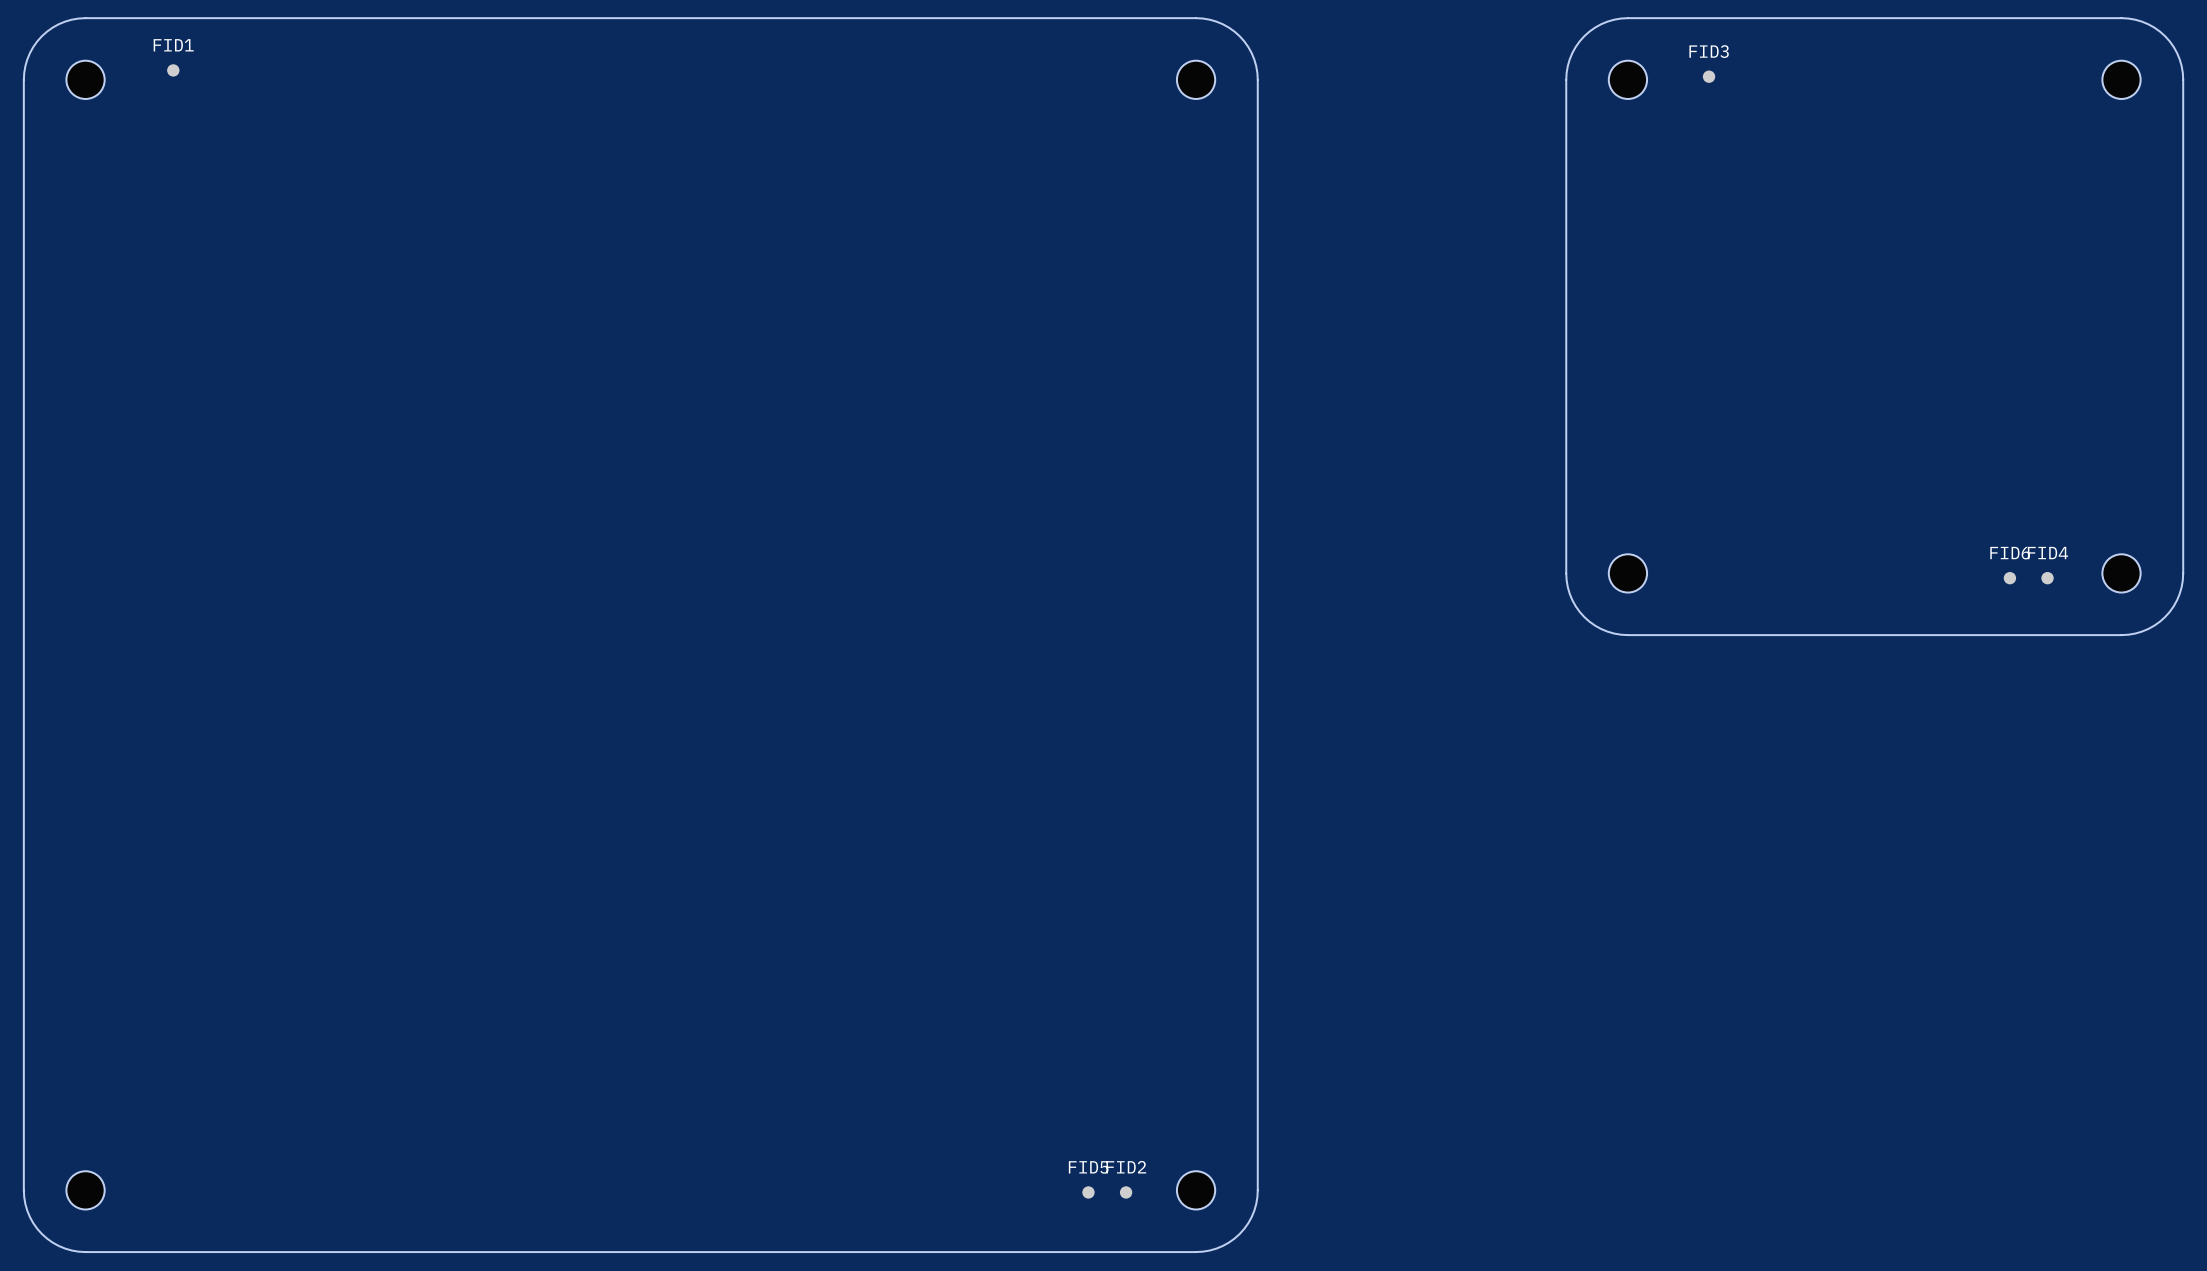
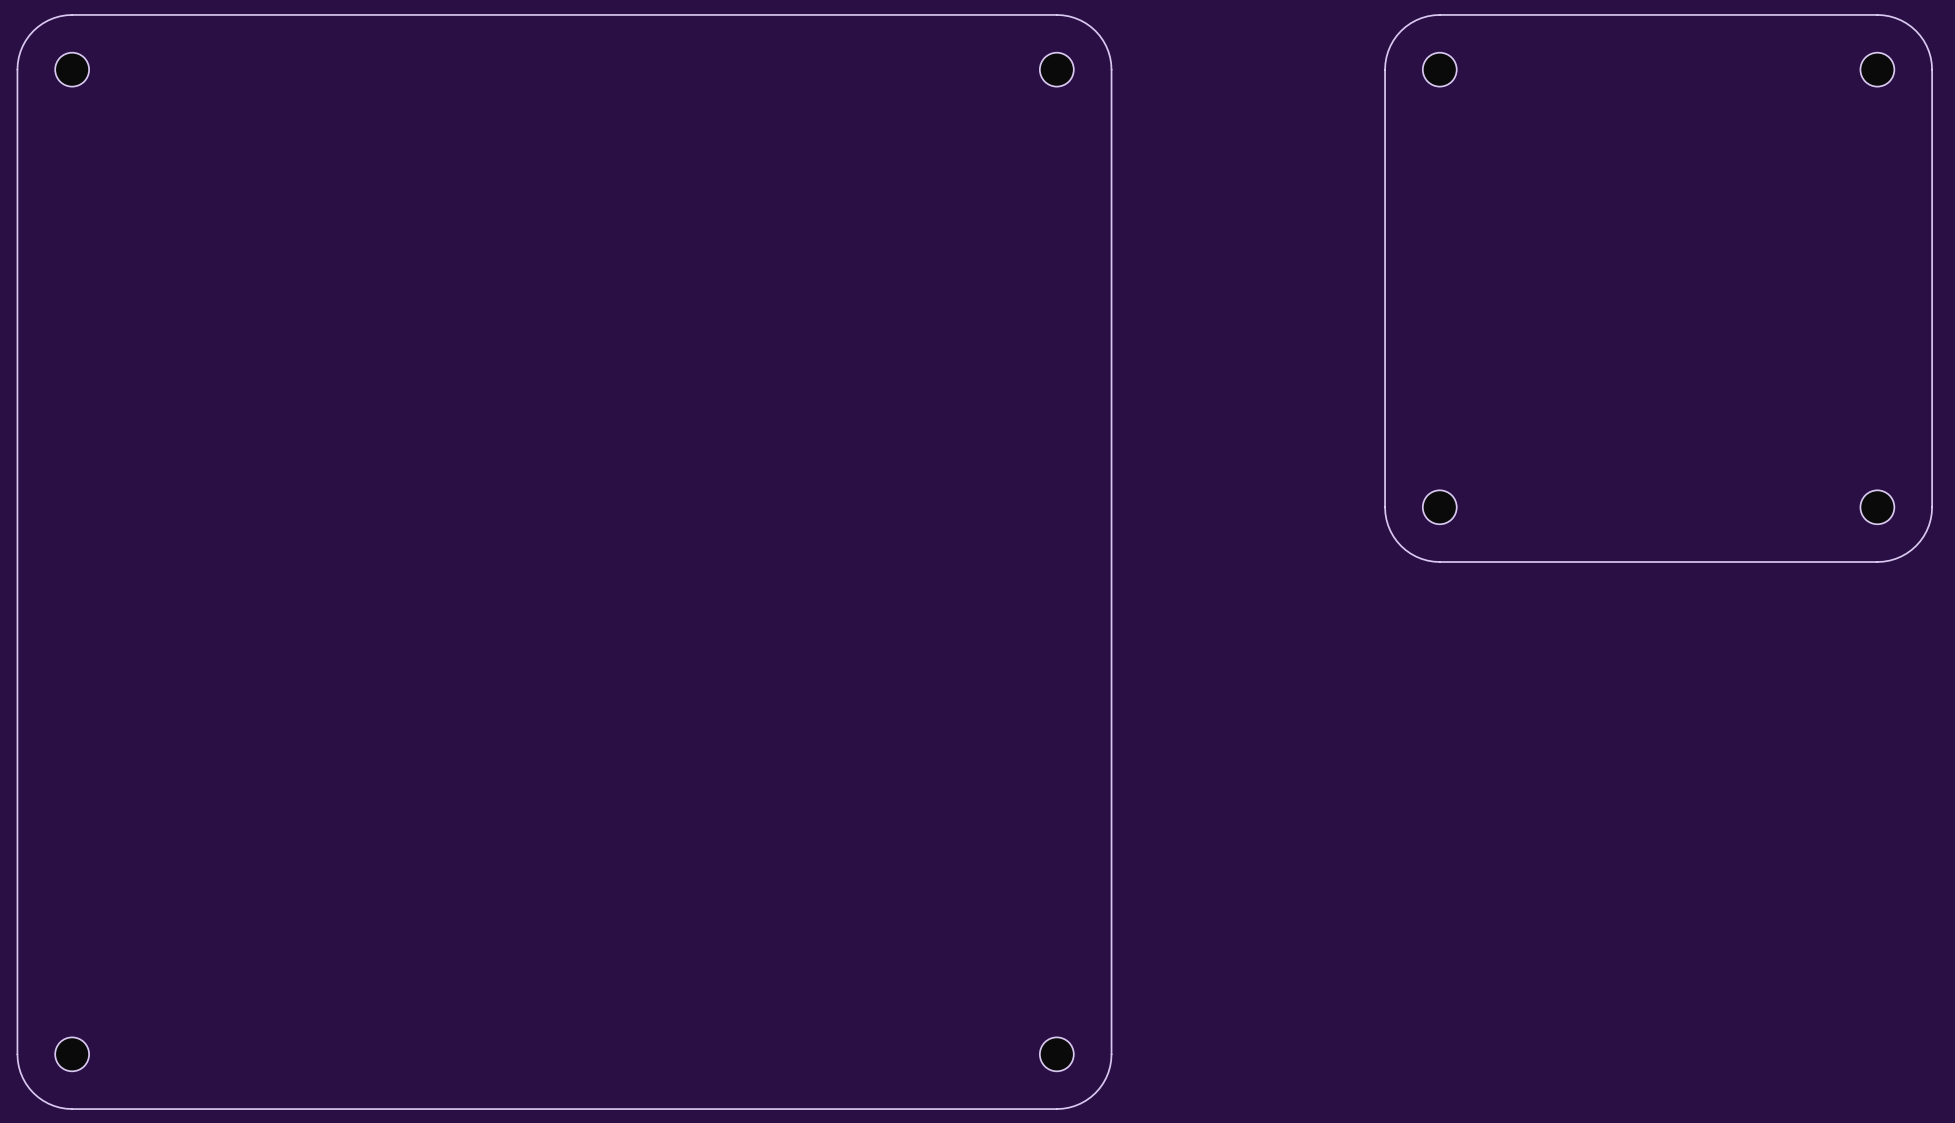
FID1: (173, 70) -> none
FID3: (1709, 76) -> none
FID6: (2009, 578) -> none
FID4: (2047, 578) -> none
FID5: (1088, 1192) -> none
FID2: (1126, 1192) -> none

